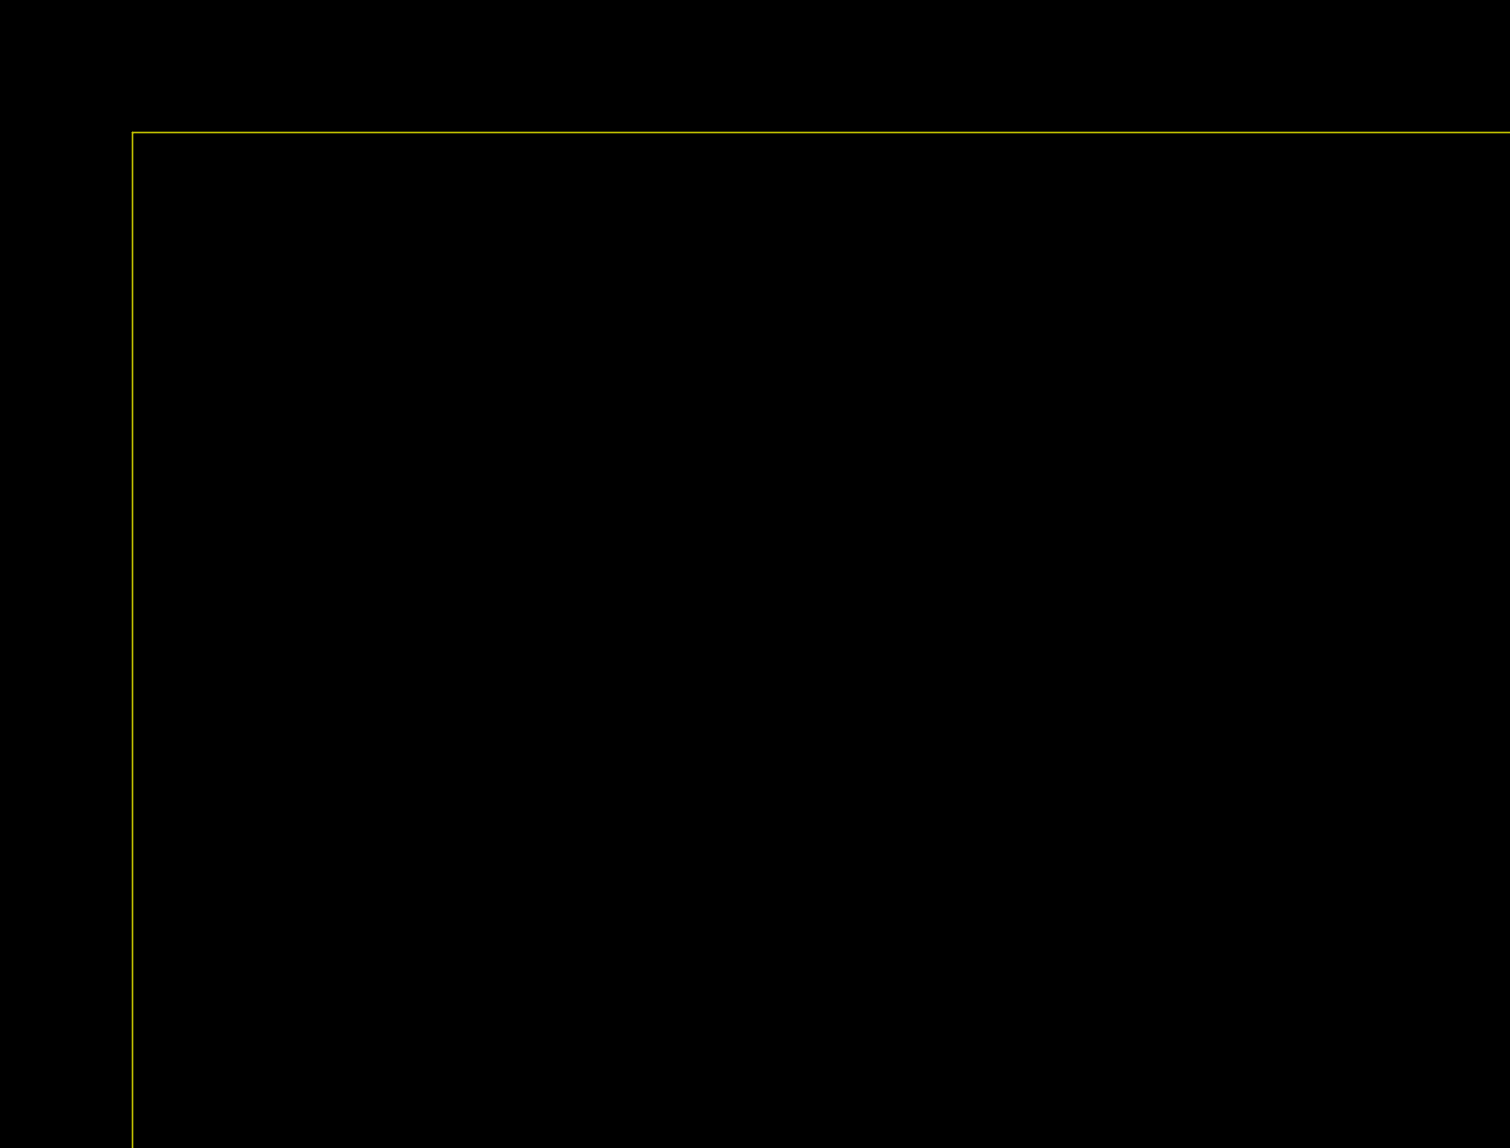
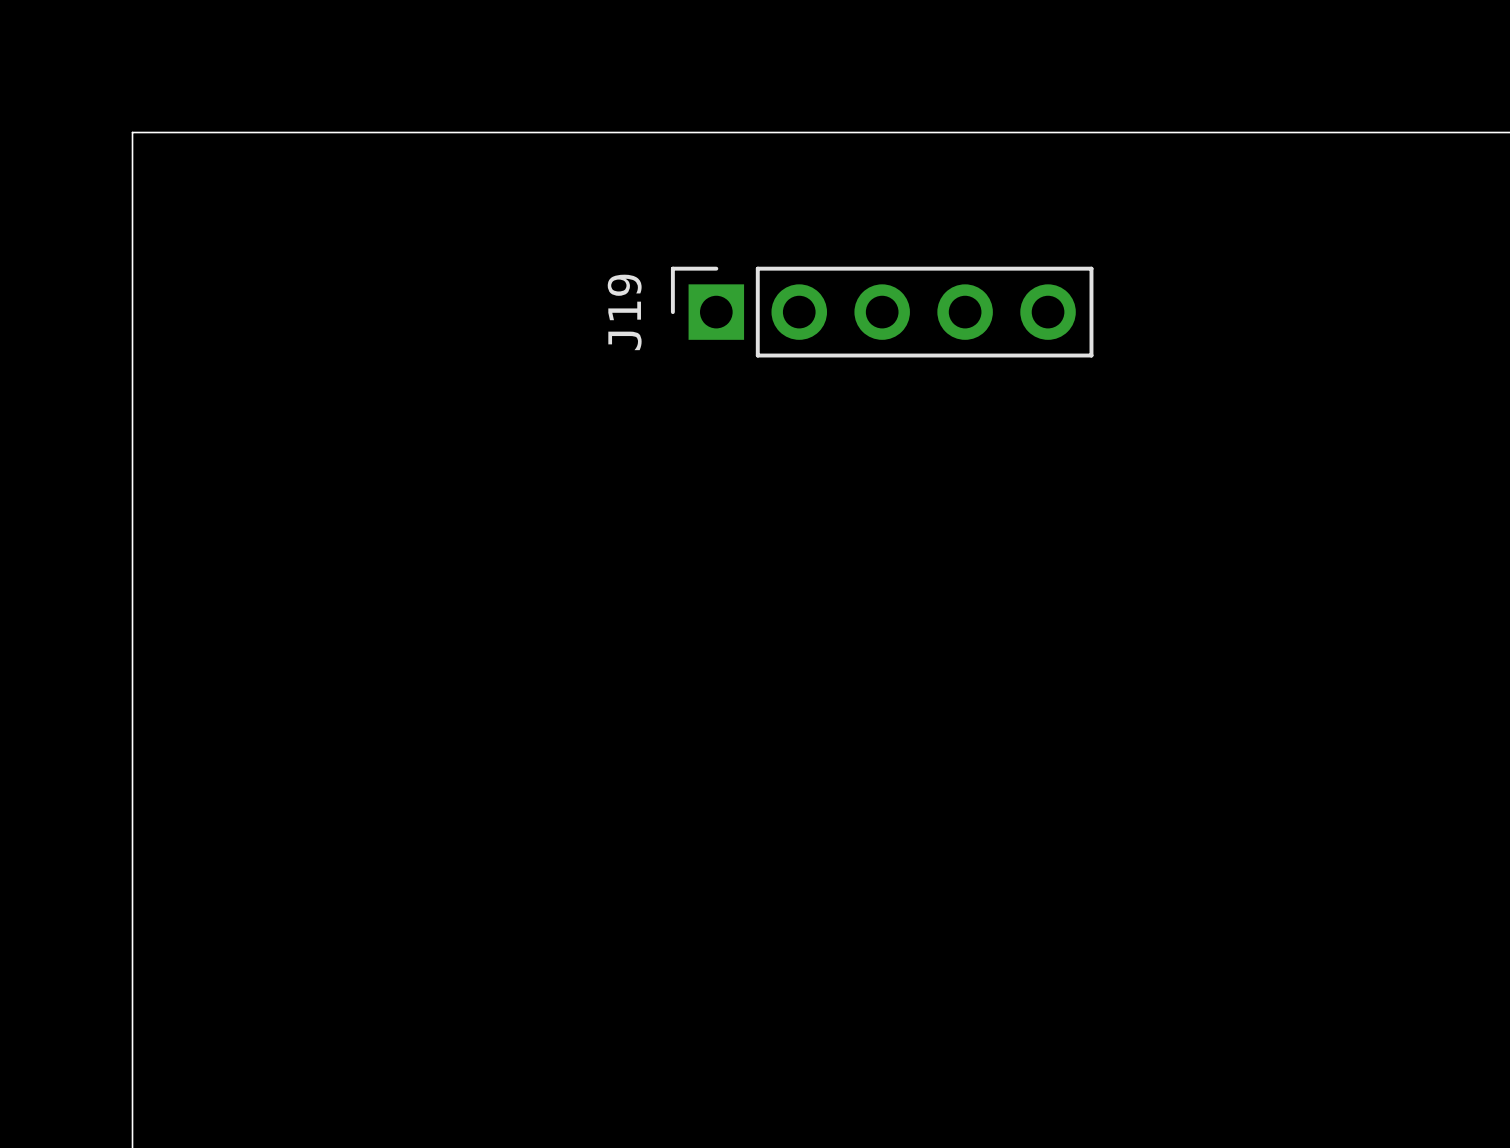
J19: none -> (882, 312)

